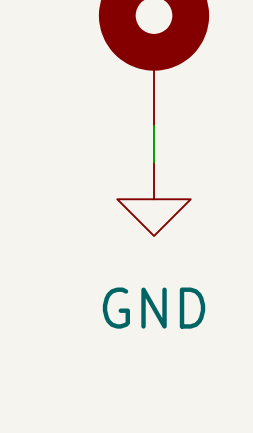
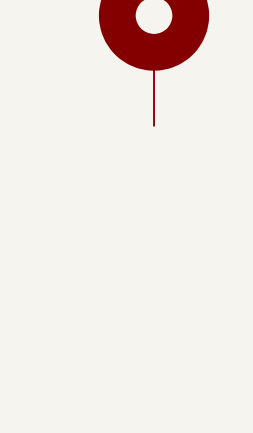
wire: (154, 125) (154, 162) -> none
power symbol: GND (154, 199) -> none

